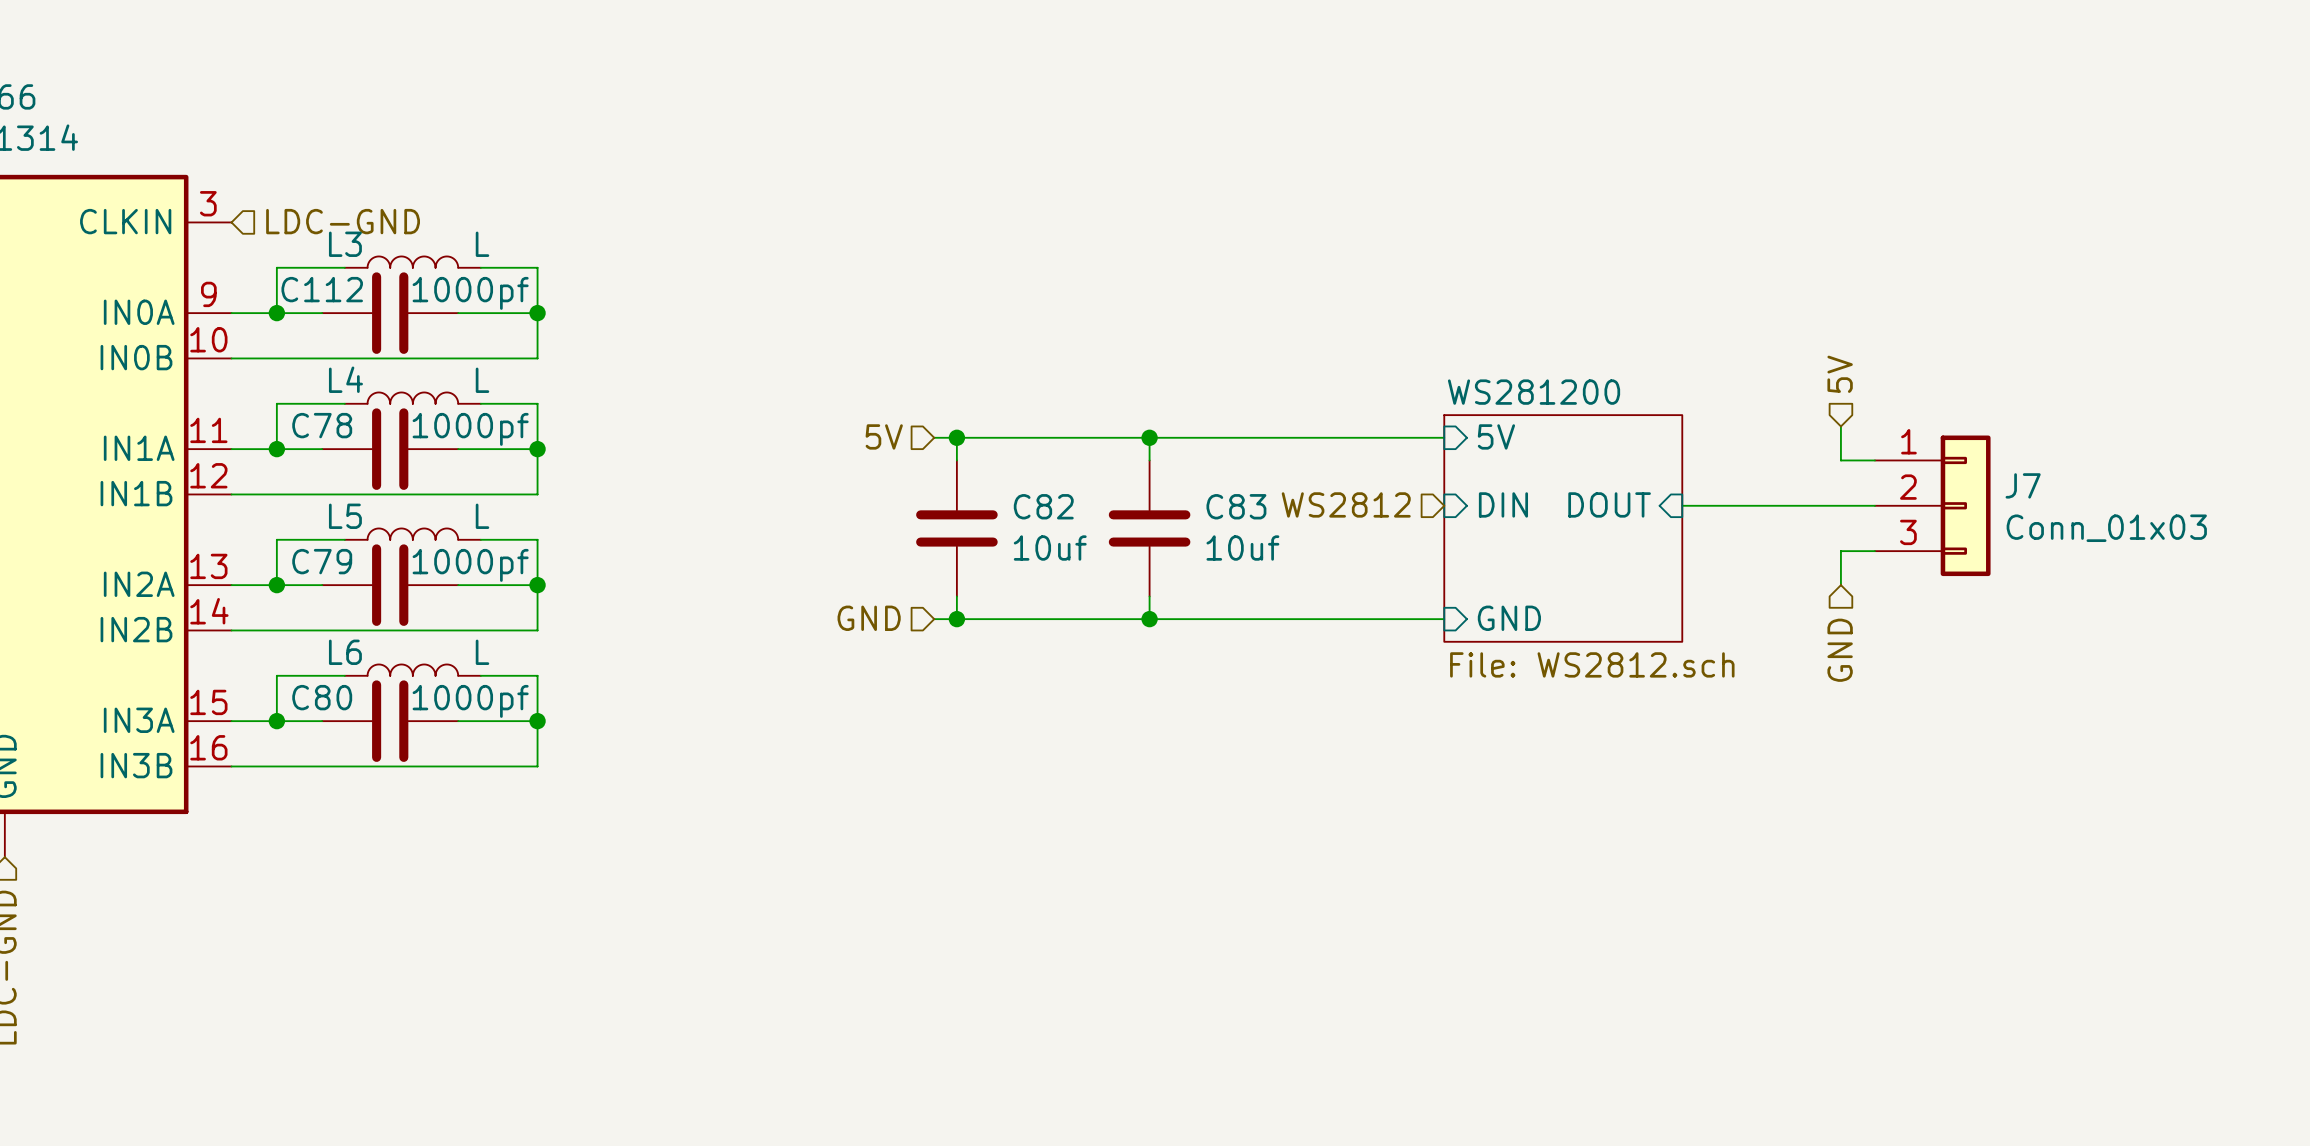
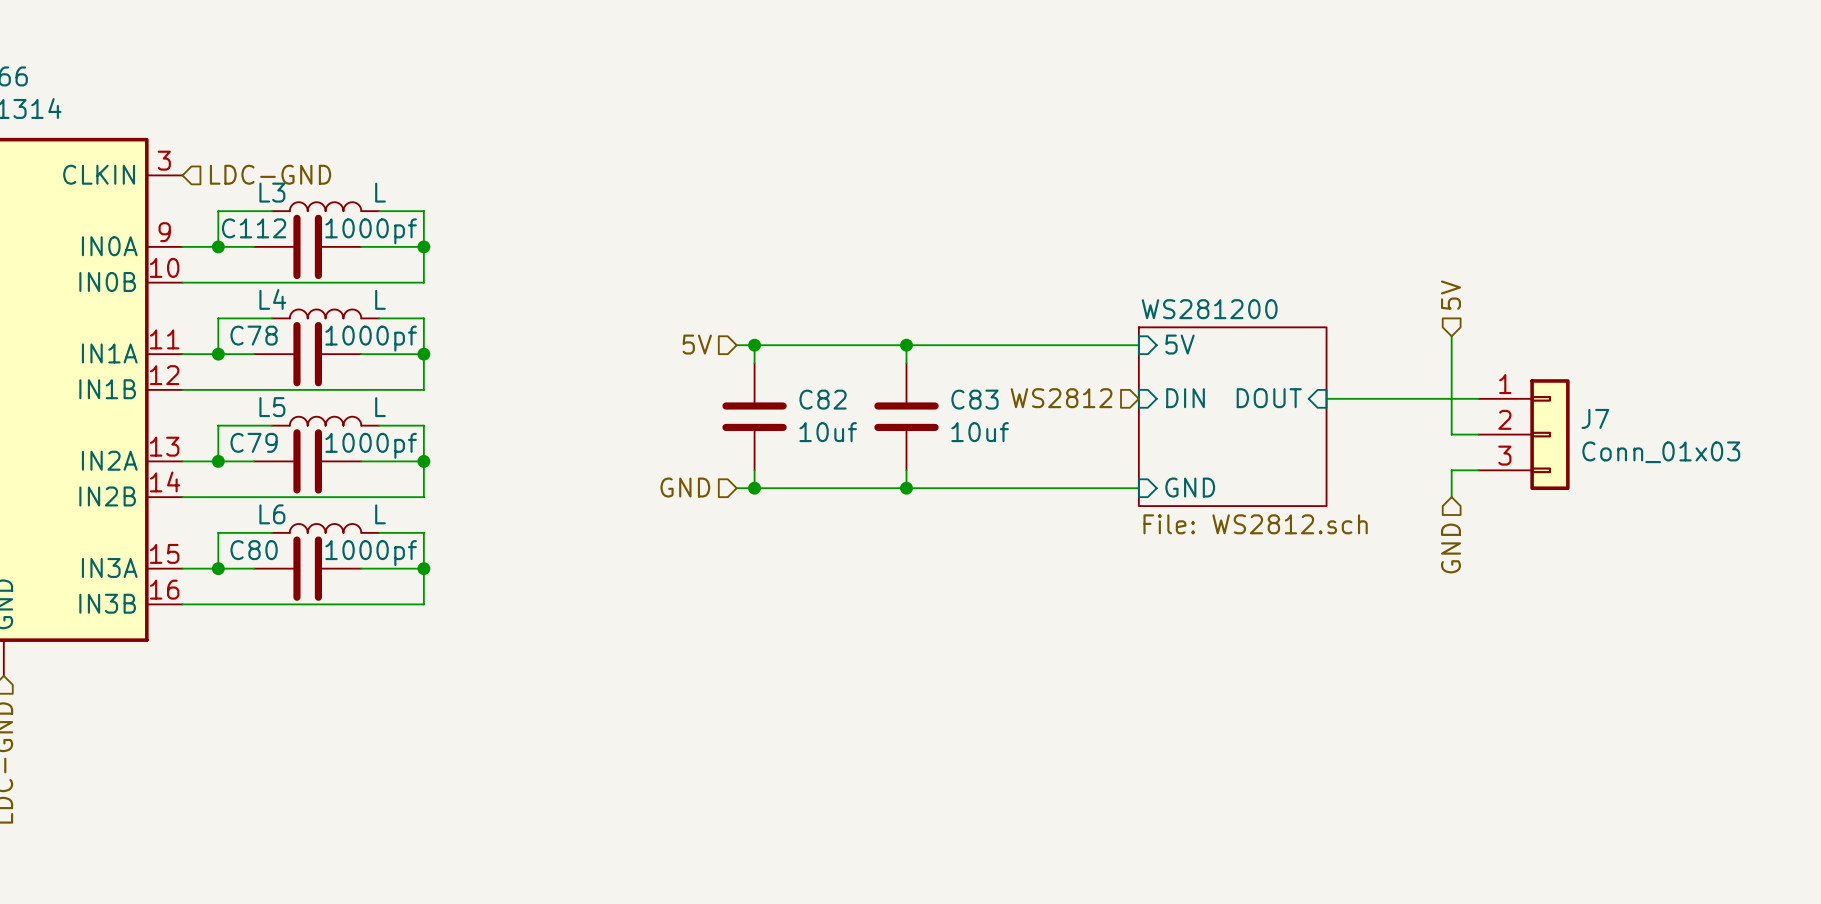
wire: (1840, 460) (1874, 460) -> (1451, 363) (1451, 434)
J7 position: (1932, 505) -> (1524, 434)
wire: (1840, 551) (1840, 585) -> none
wire: none -> (1478, 470) (1451, 470) (1451, 497)
hierarchical label position: GND (1840, 650) -> GND (1451, 548)

